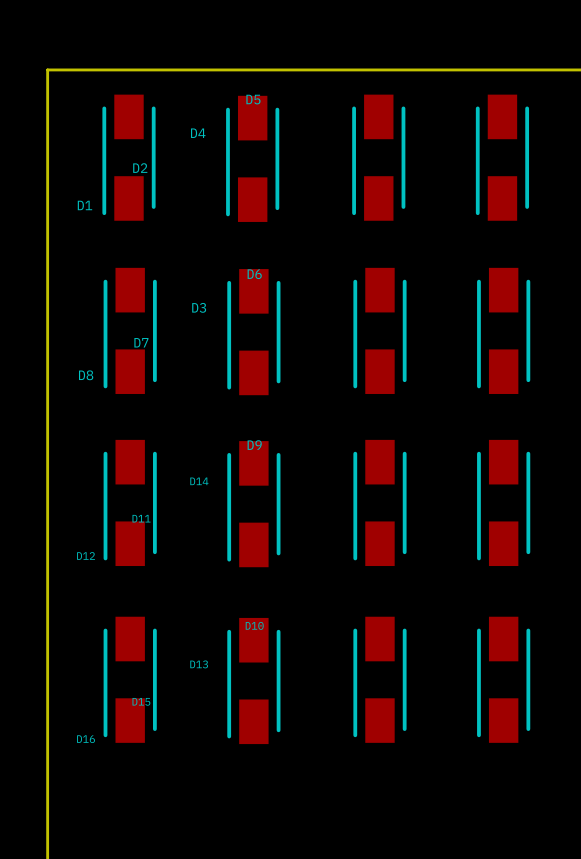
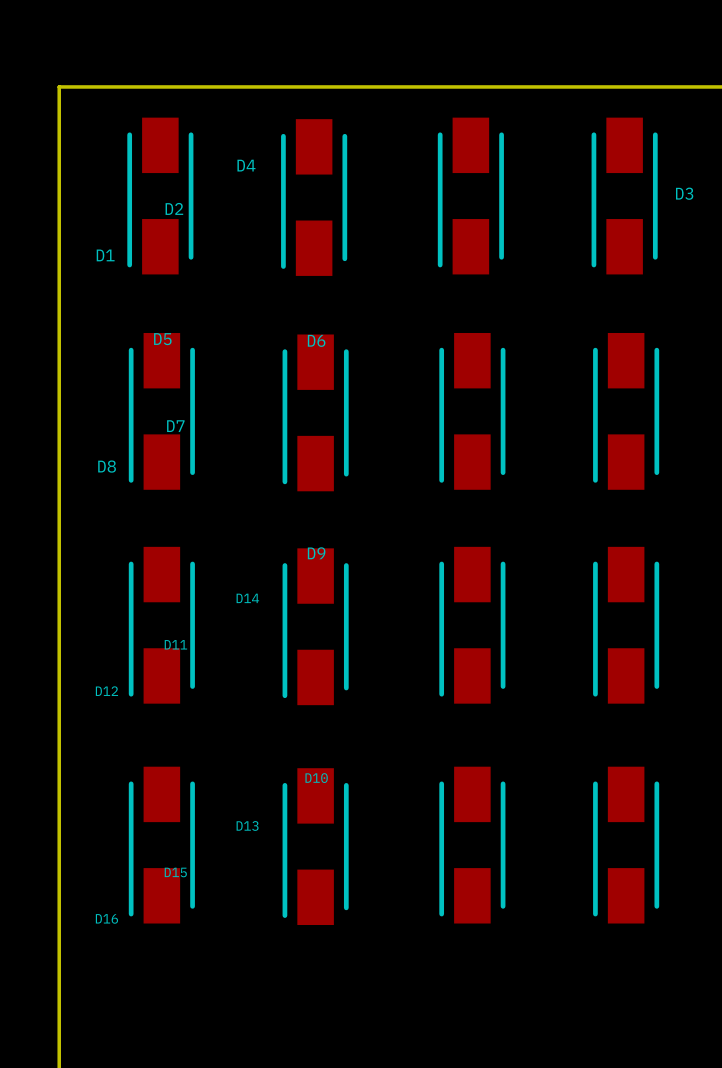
D5 name: D5 (253, 99) -> D3 (684, 193)
D3 name: D3 (199, 307) -> D5 (162, 339)

